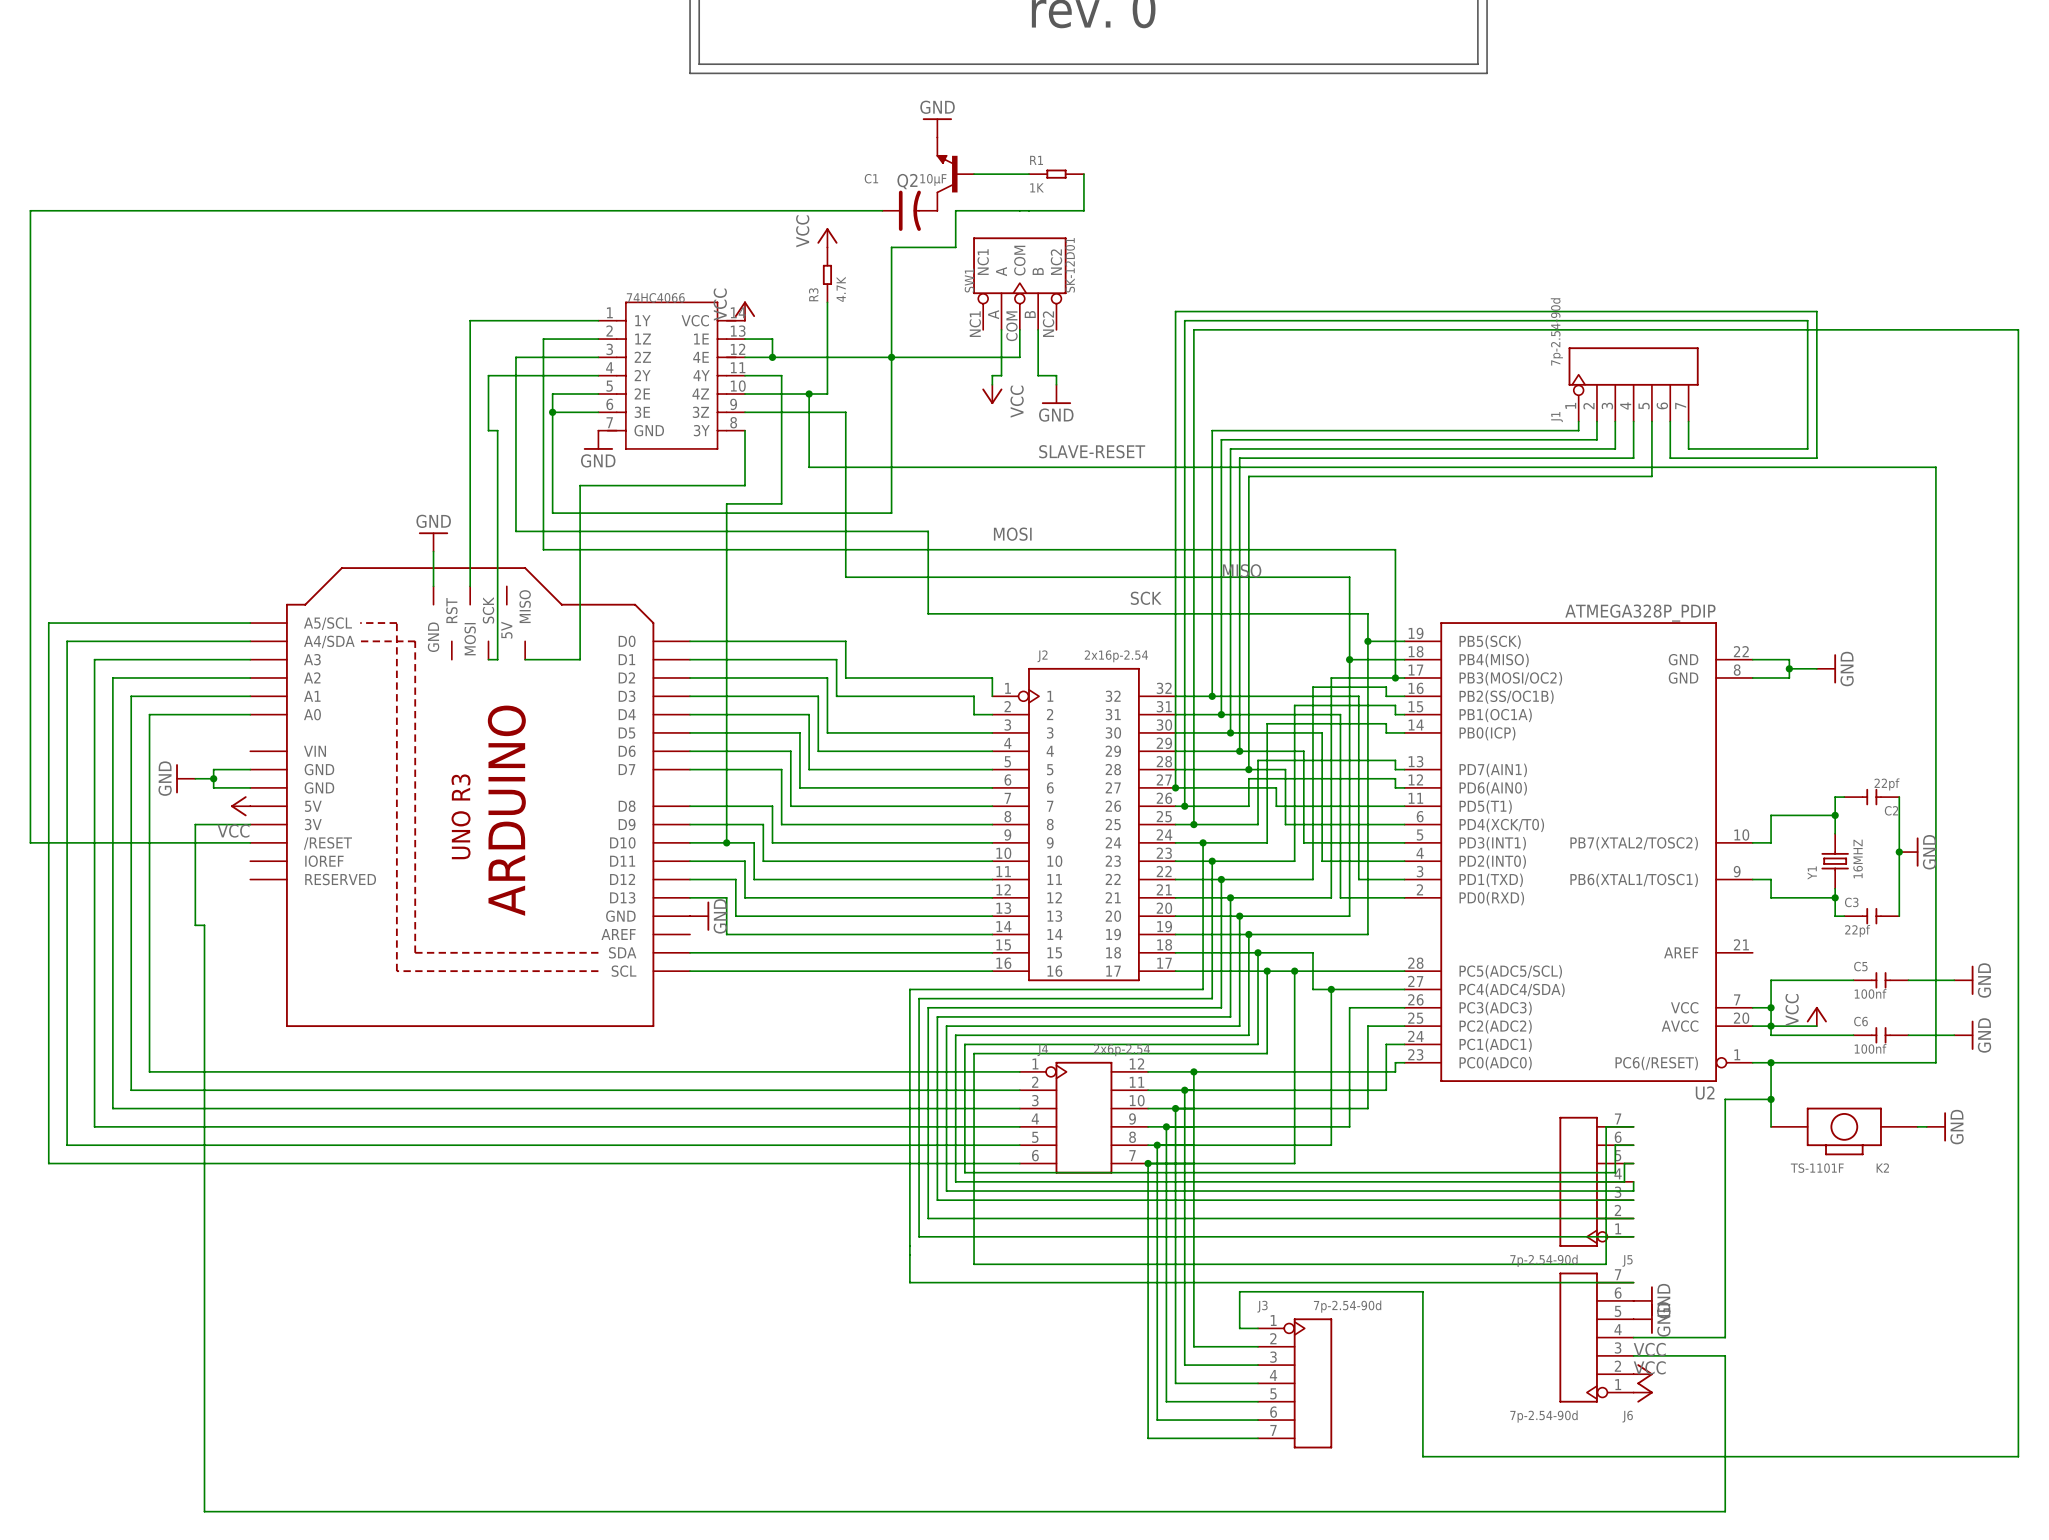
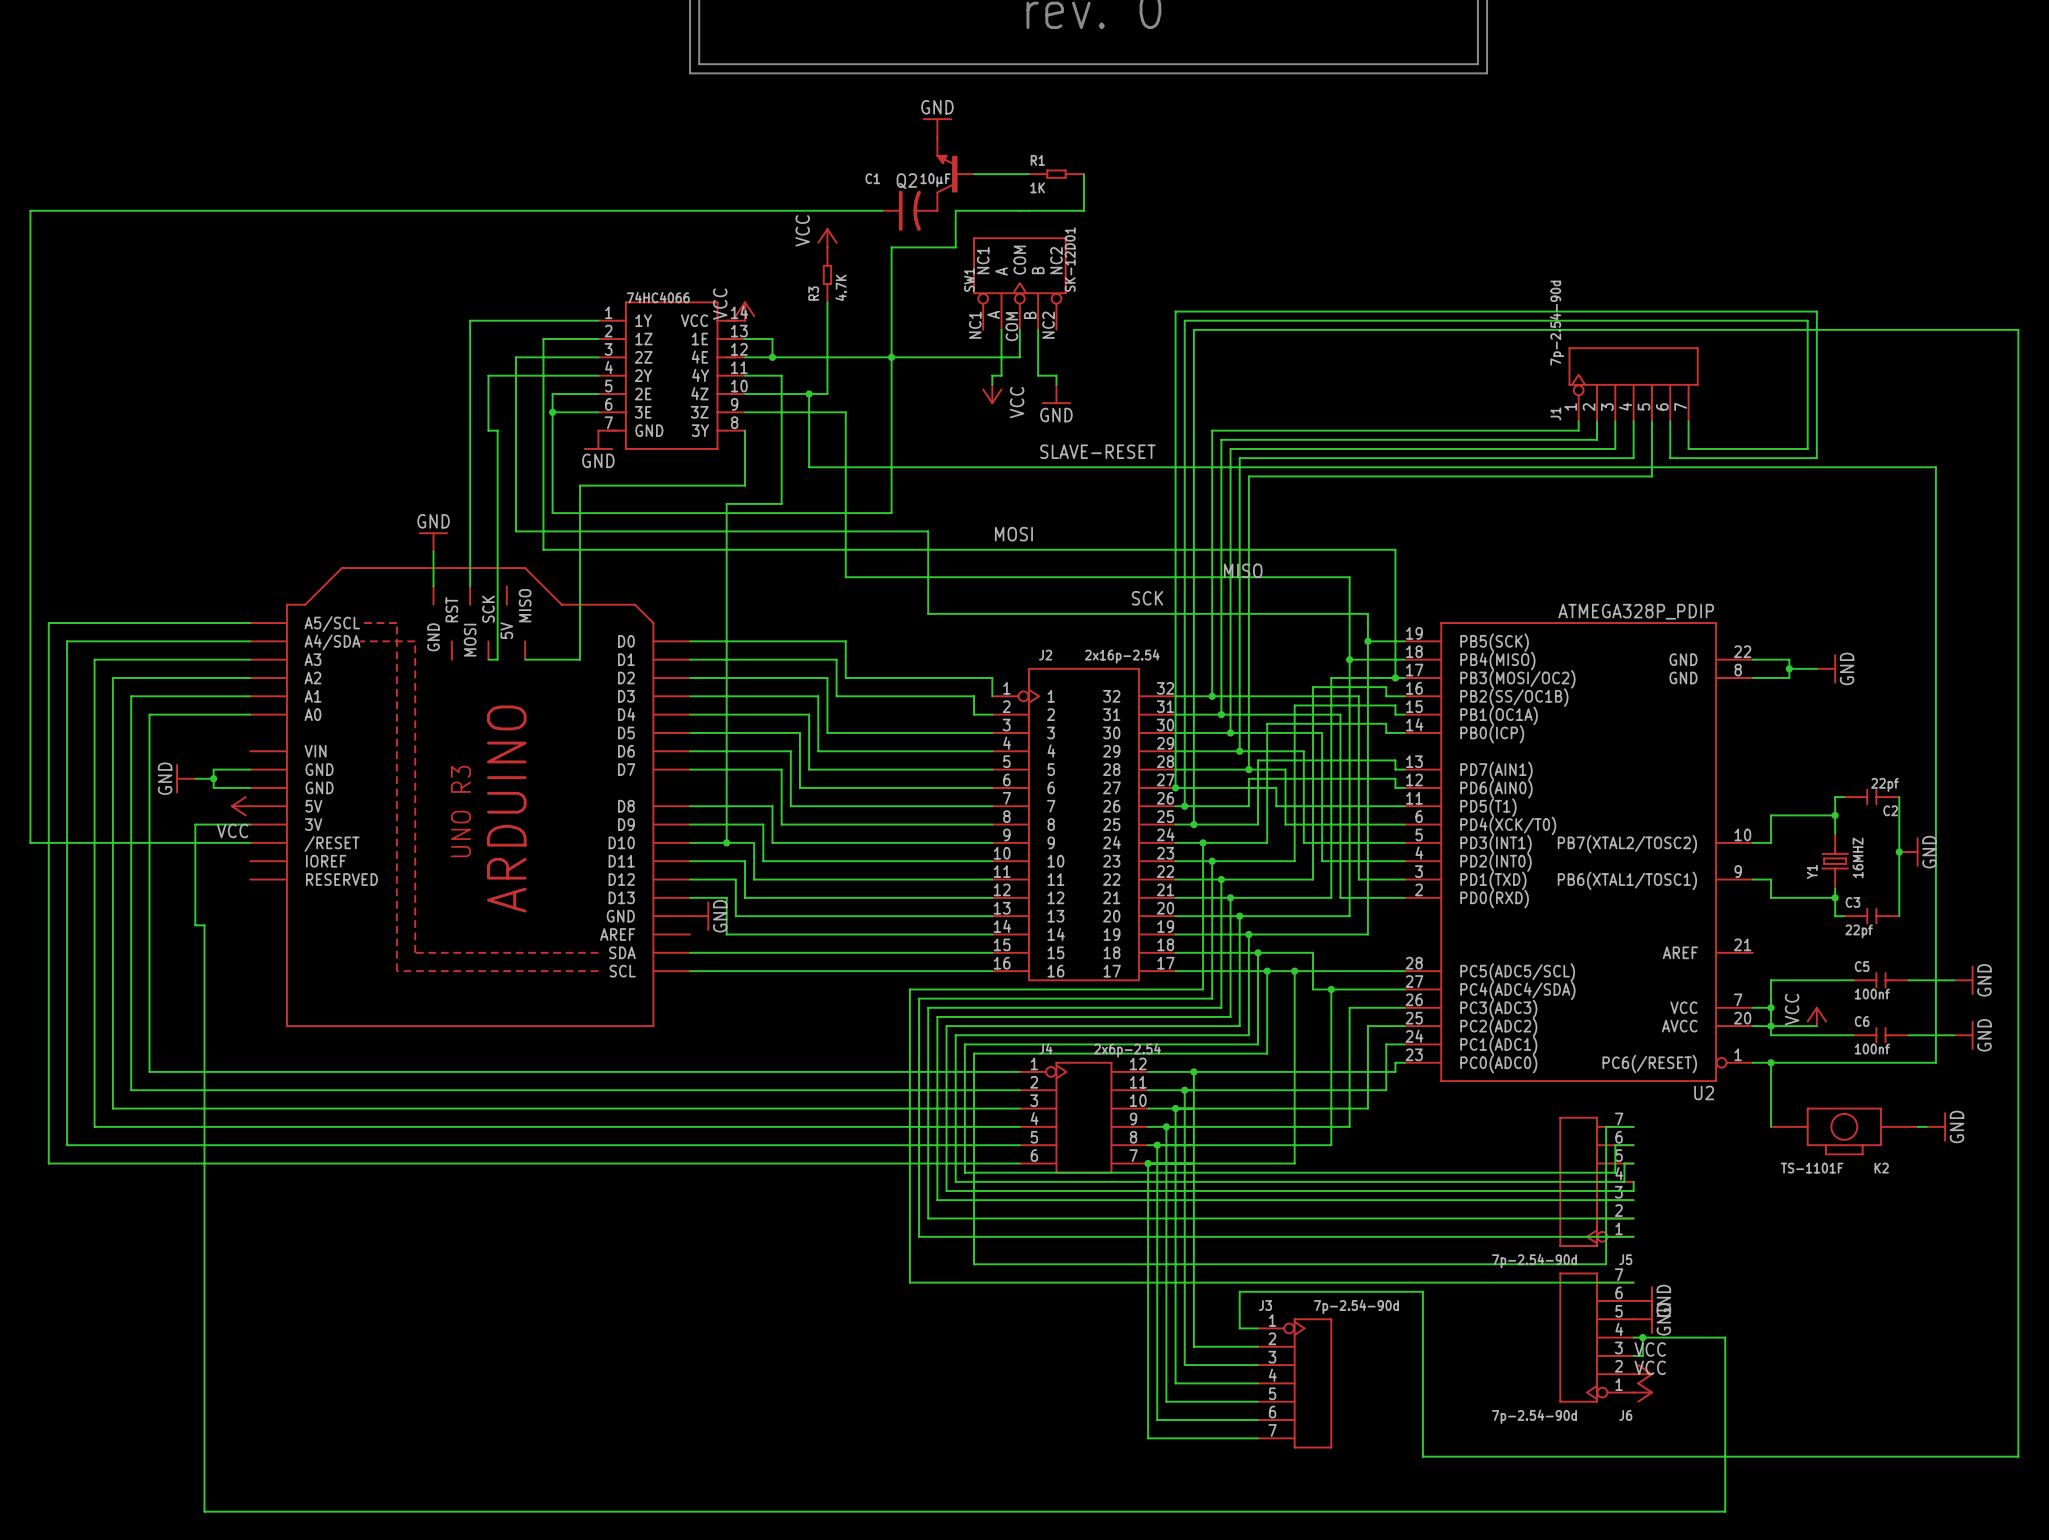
wire: (1771, 1099) (1725, 1099) (1725, 1337) -> (1725, 1355) (1725, 1337)
junction: (1771, 1099) -> none
junction: none -> (1642, 1337)
wire: (1642, 1355) (1725, 1355) -> (1642, 1355) (1642, 1337)

